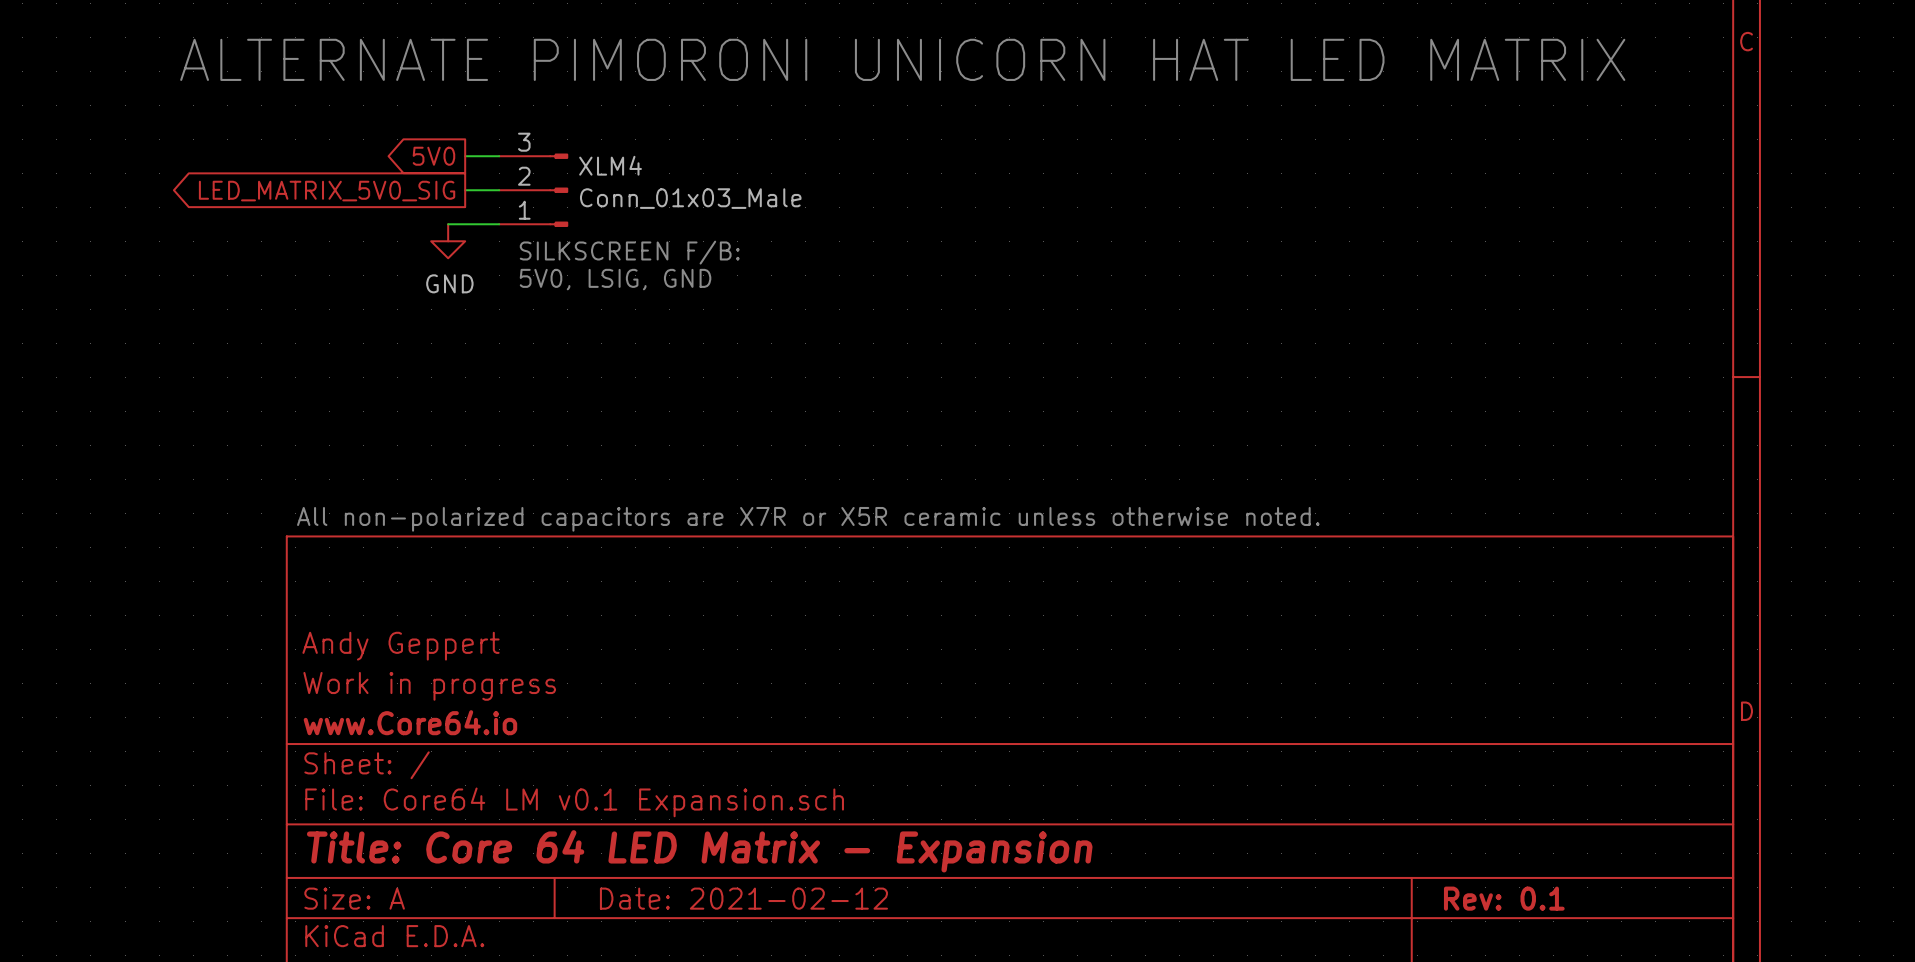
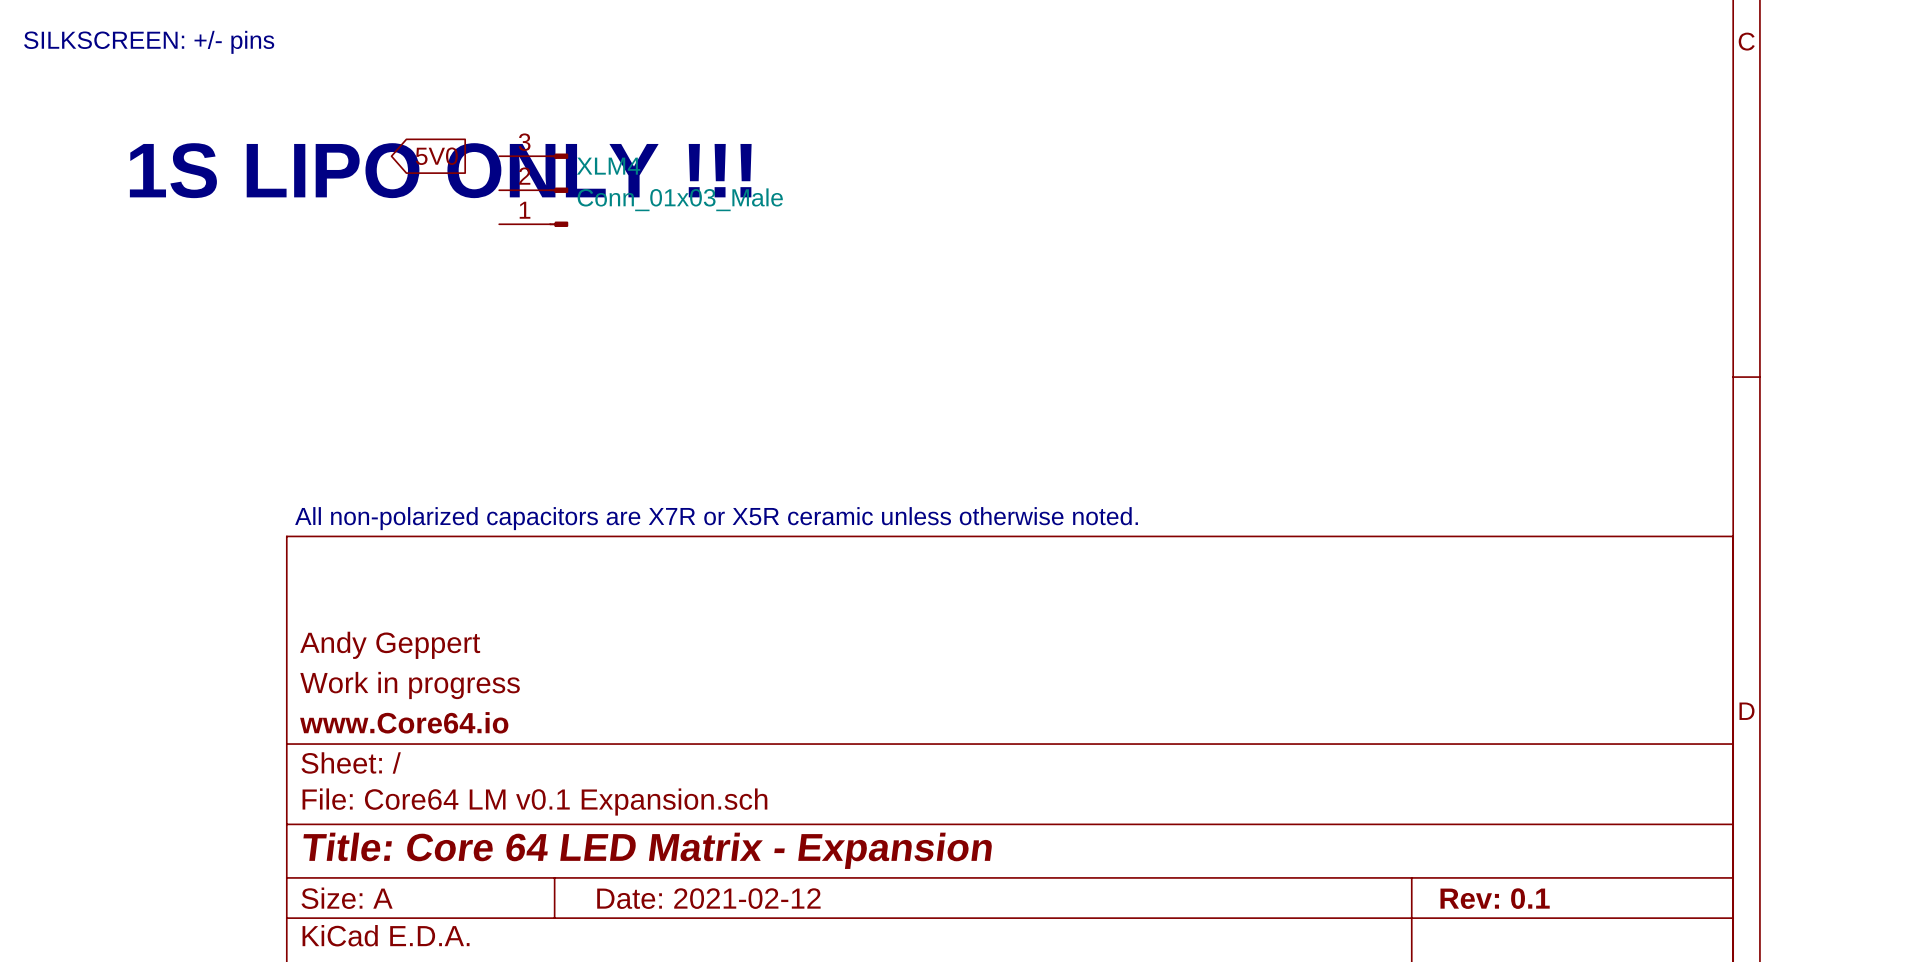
text: none -> SILKSCREEN: +/- pins (149, 42)
text: ALTERNATE PIMORONI UNICORN HAT LED MATRIX (902, 59) -> none
wire: (465, 156) (499, 156) -> none
text: none -> 1S LIPO ONLY !!! (440, 170)
wire: (465, 190) (499, 190) -> none
global label: LED_MATRIX_5V0_SIG (327, 191) -> none
wire: (448, 224) (499, 224) -> none
power symbol: GND (448, 241) -> none
text: SILKSCREEN F/B: (629, 252) -> none
text: 5V0, LSIG, GND (615, 279) -> none

